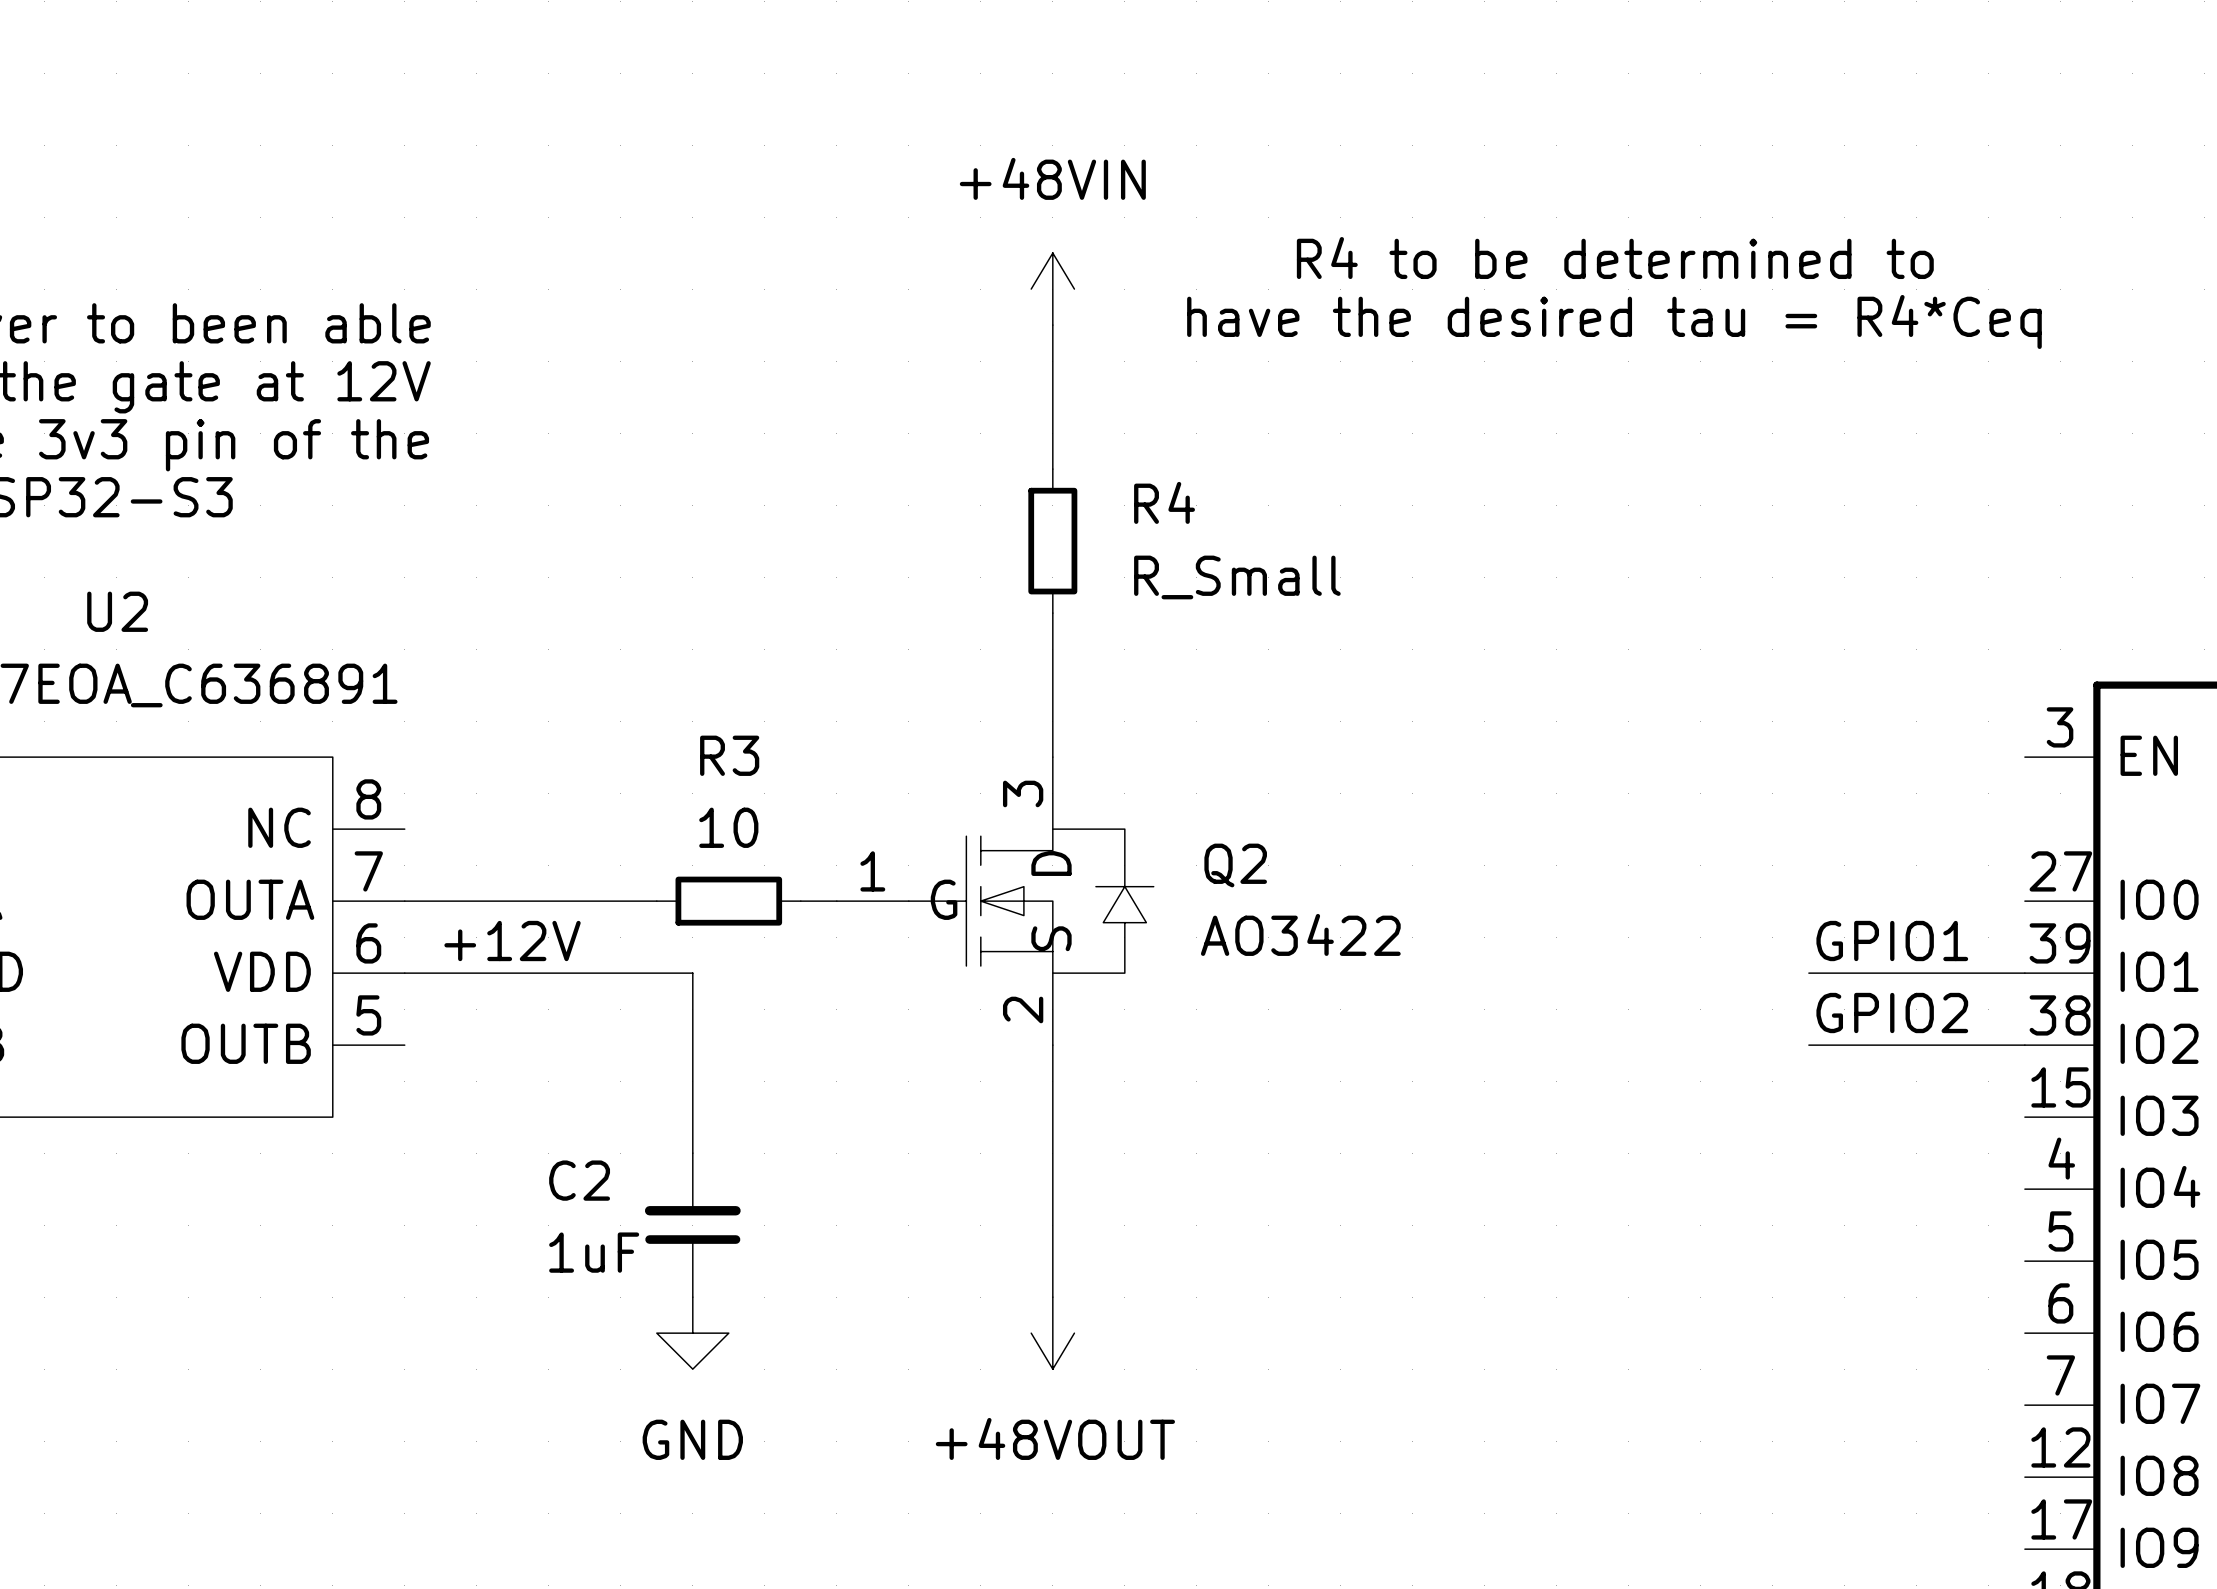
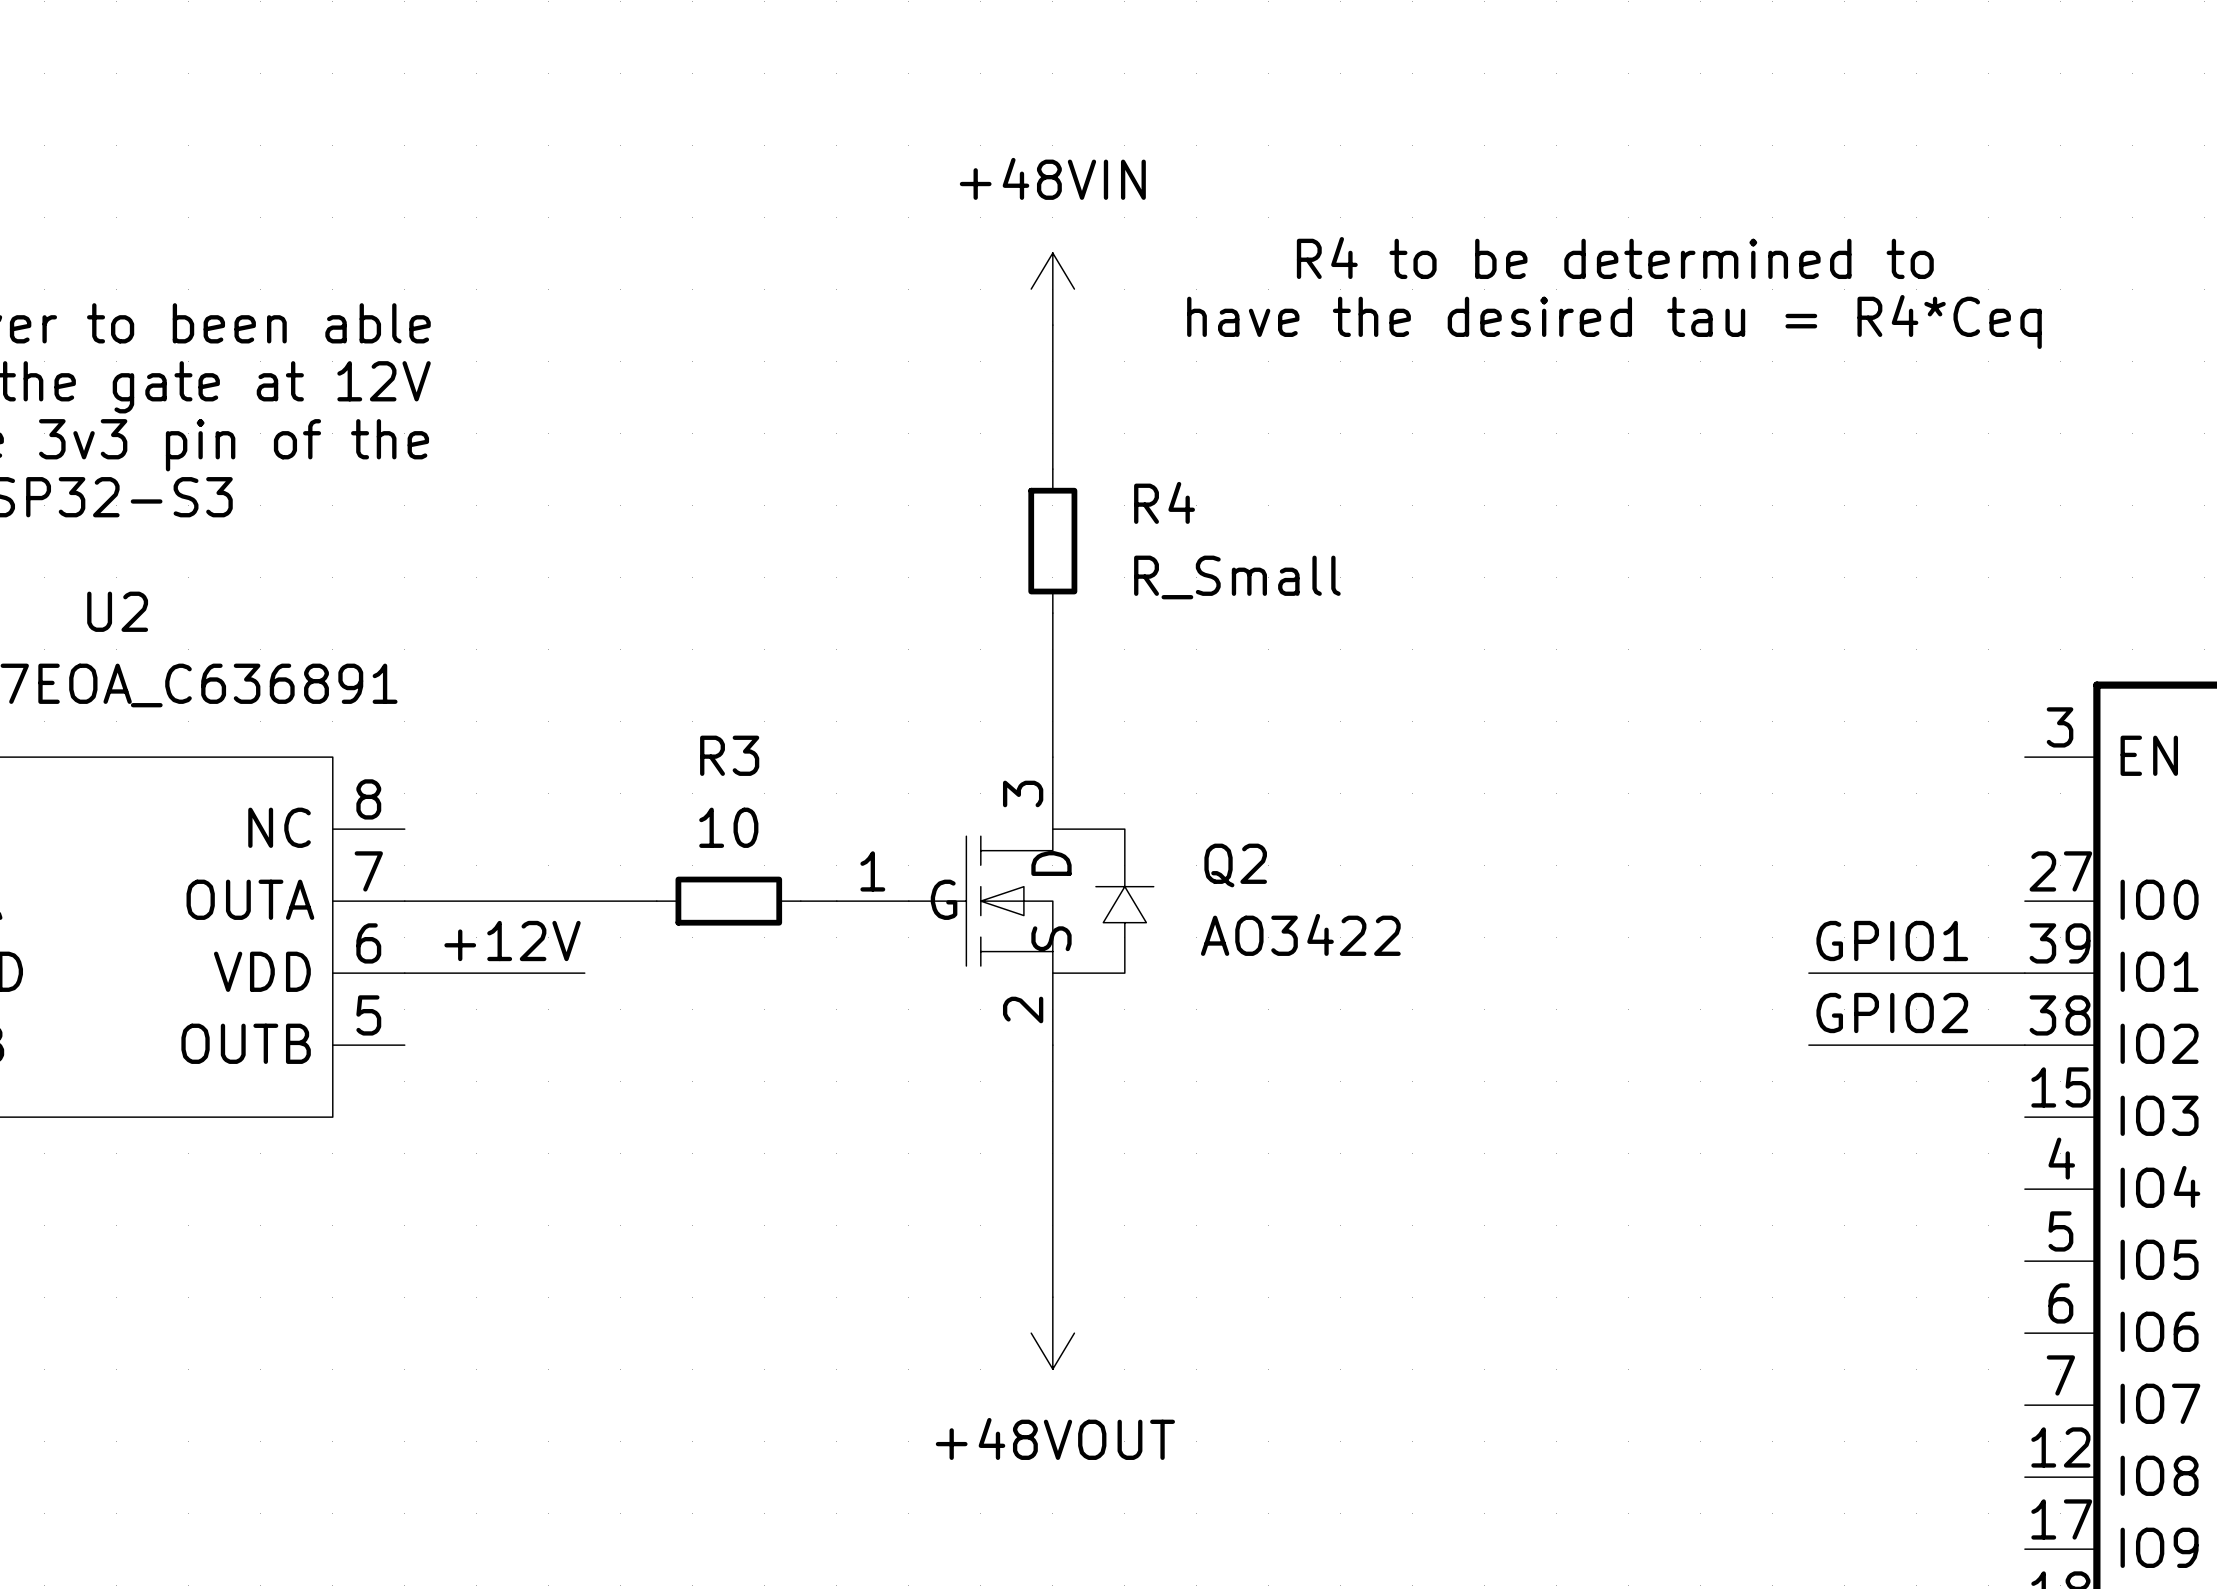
wire: (584, 973) (692, 973) (692, 1153) -> none
C2: 1uF (692, 1225) -> none
power symbol: GND (692, 1333) -> none

